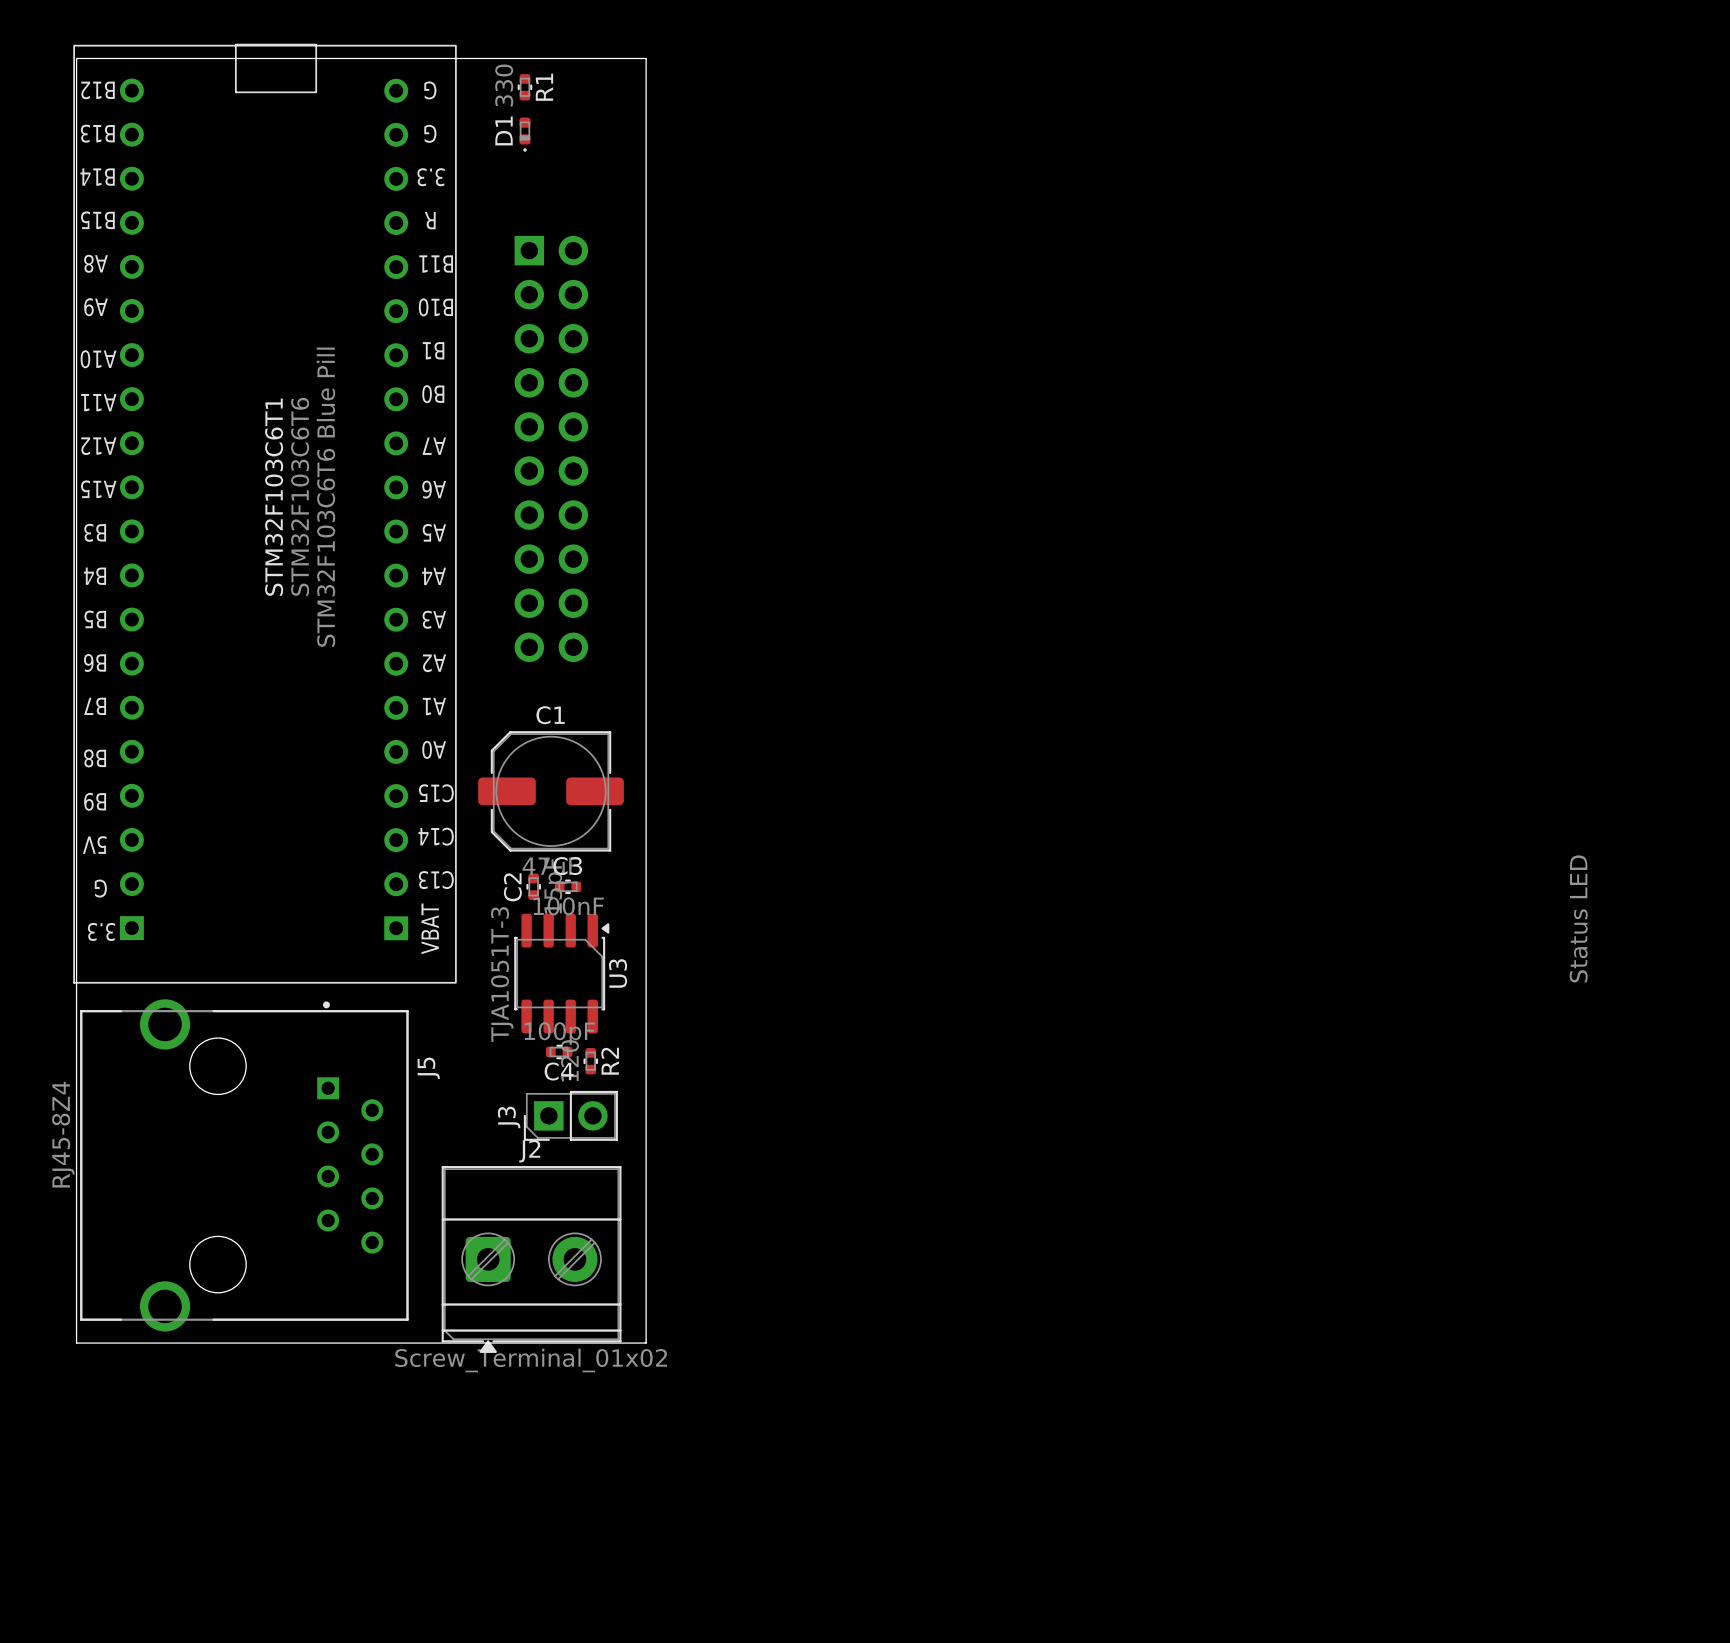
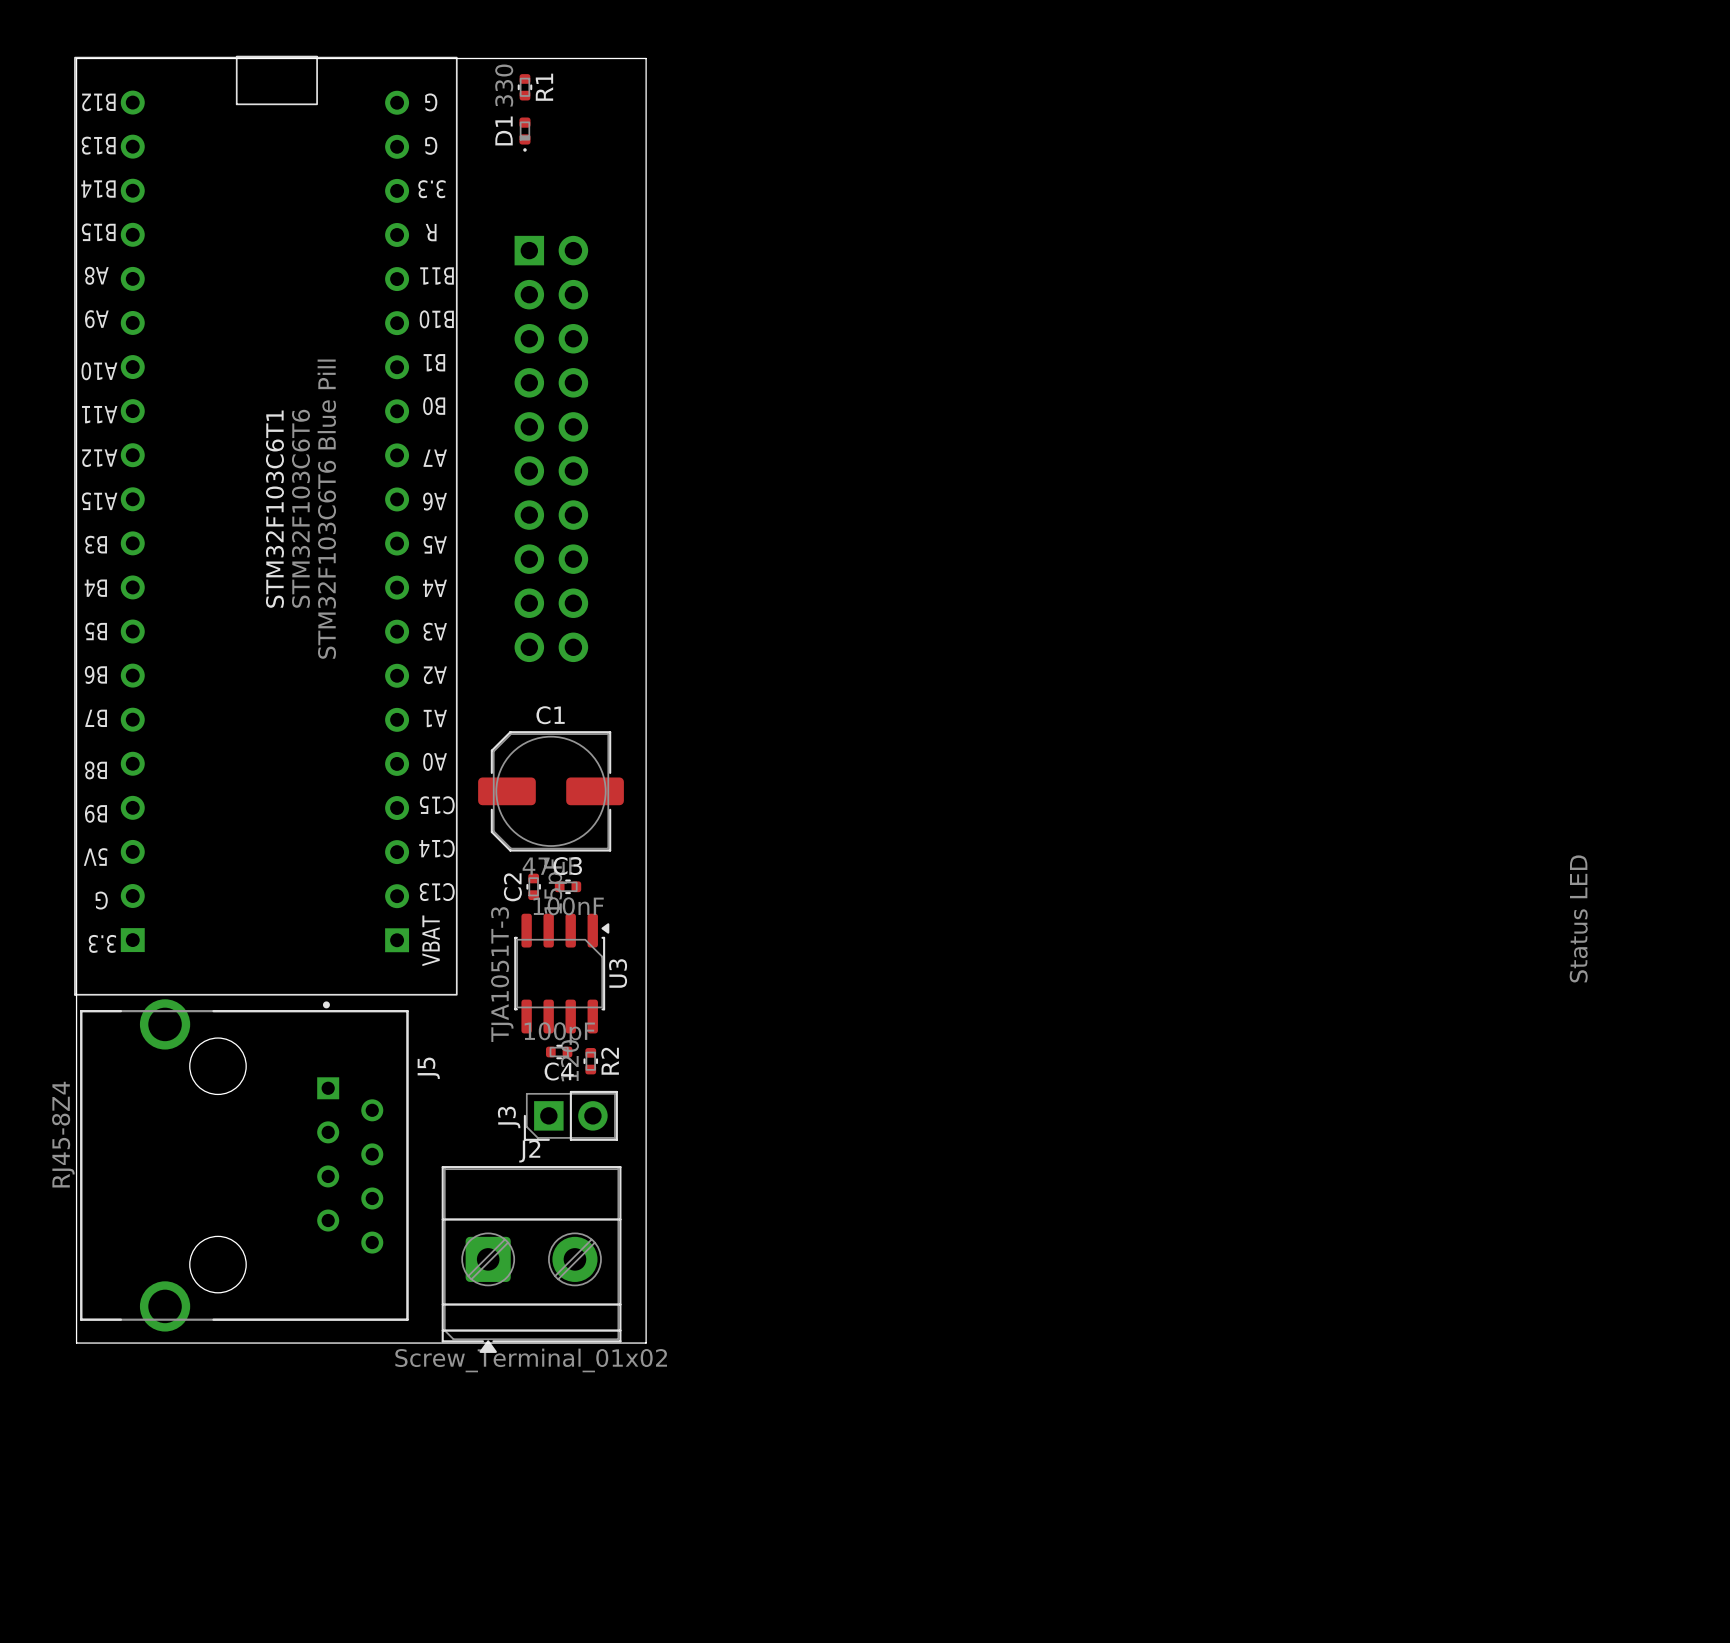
STM32F103C6T1 position: (265, 513) -> (265, 525)

